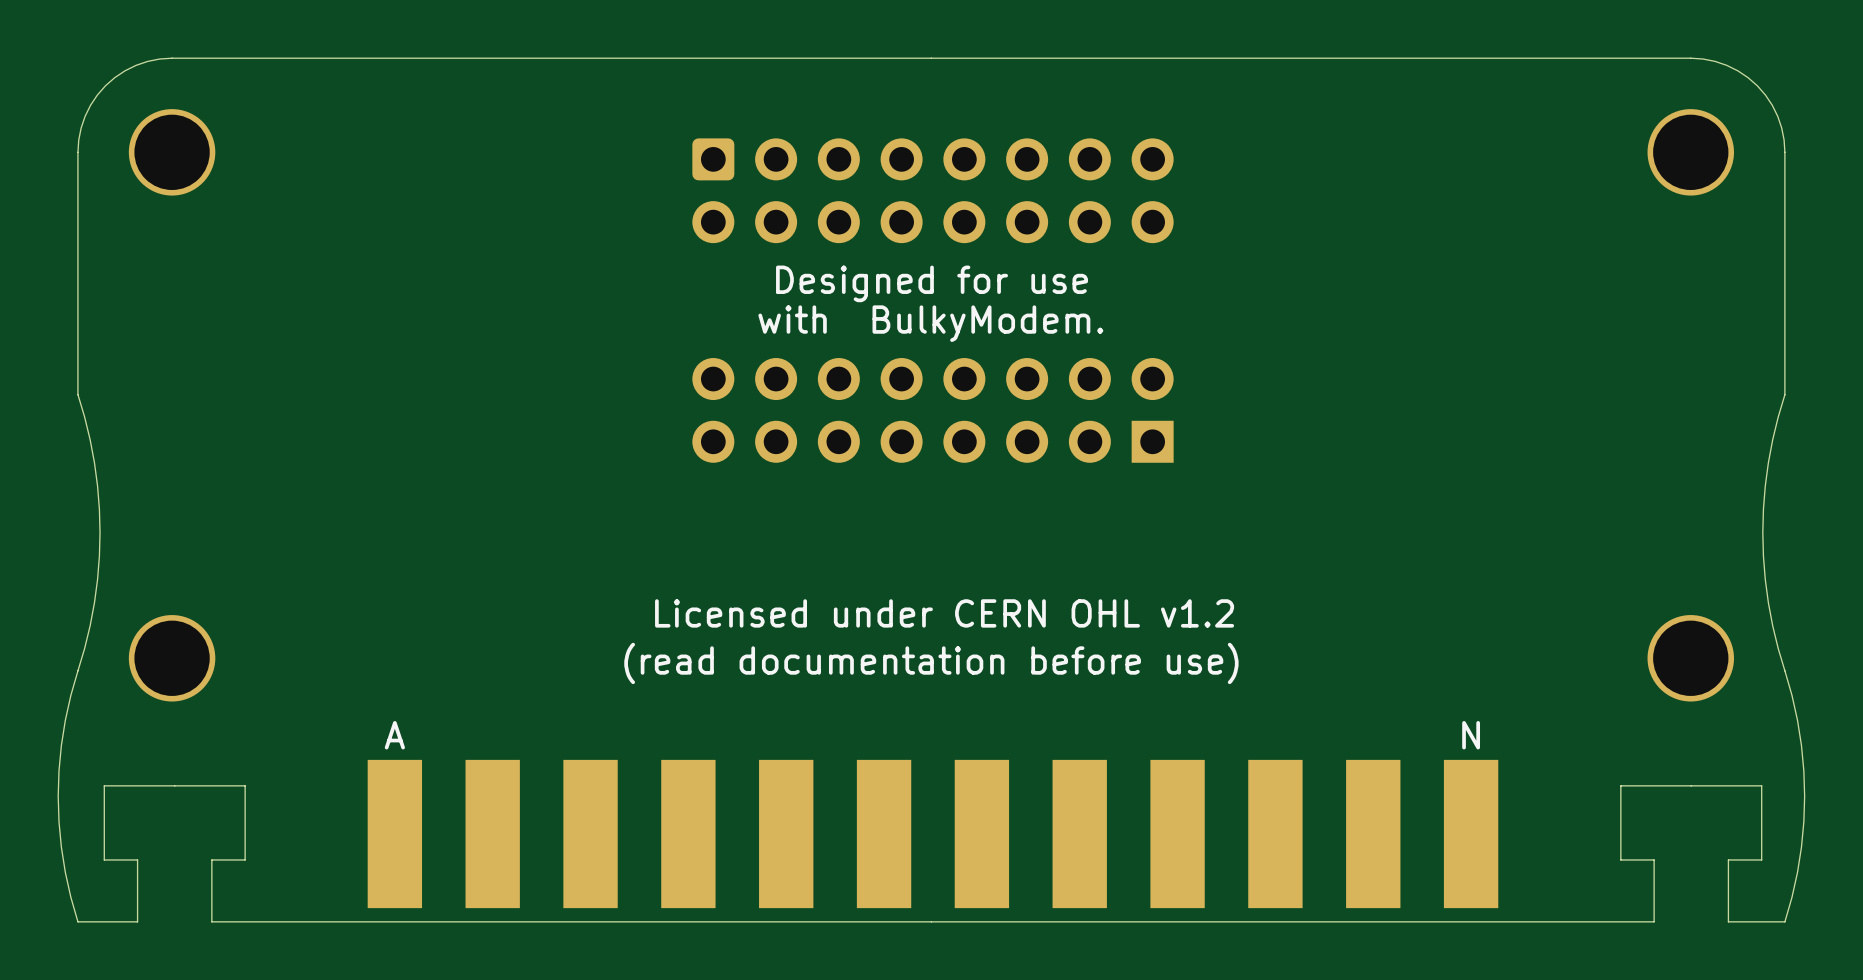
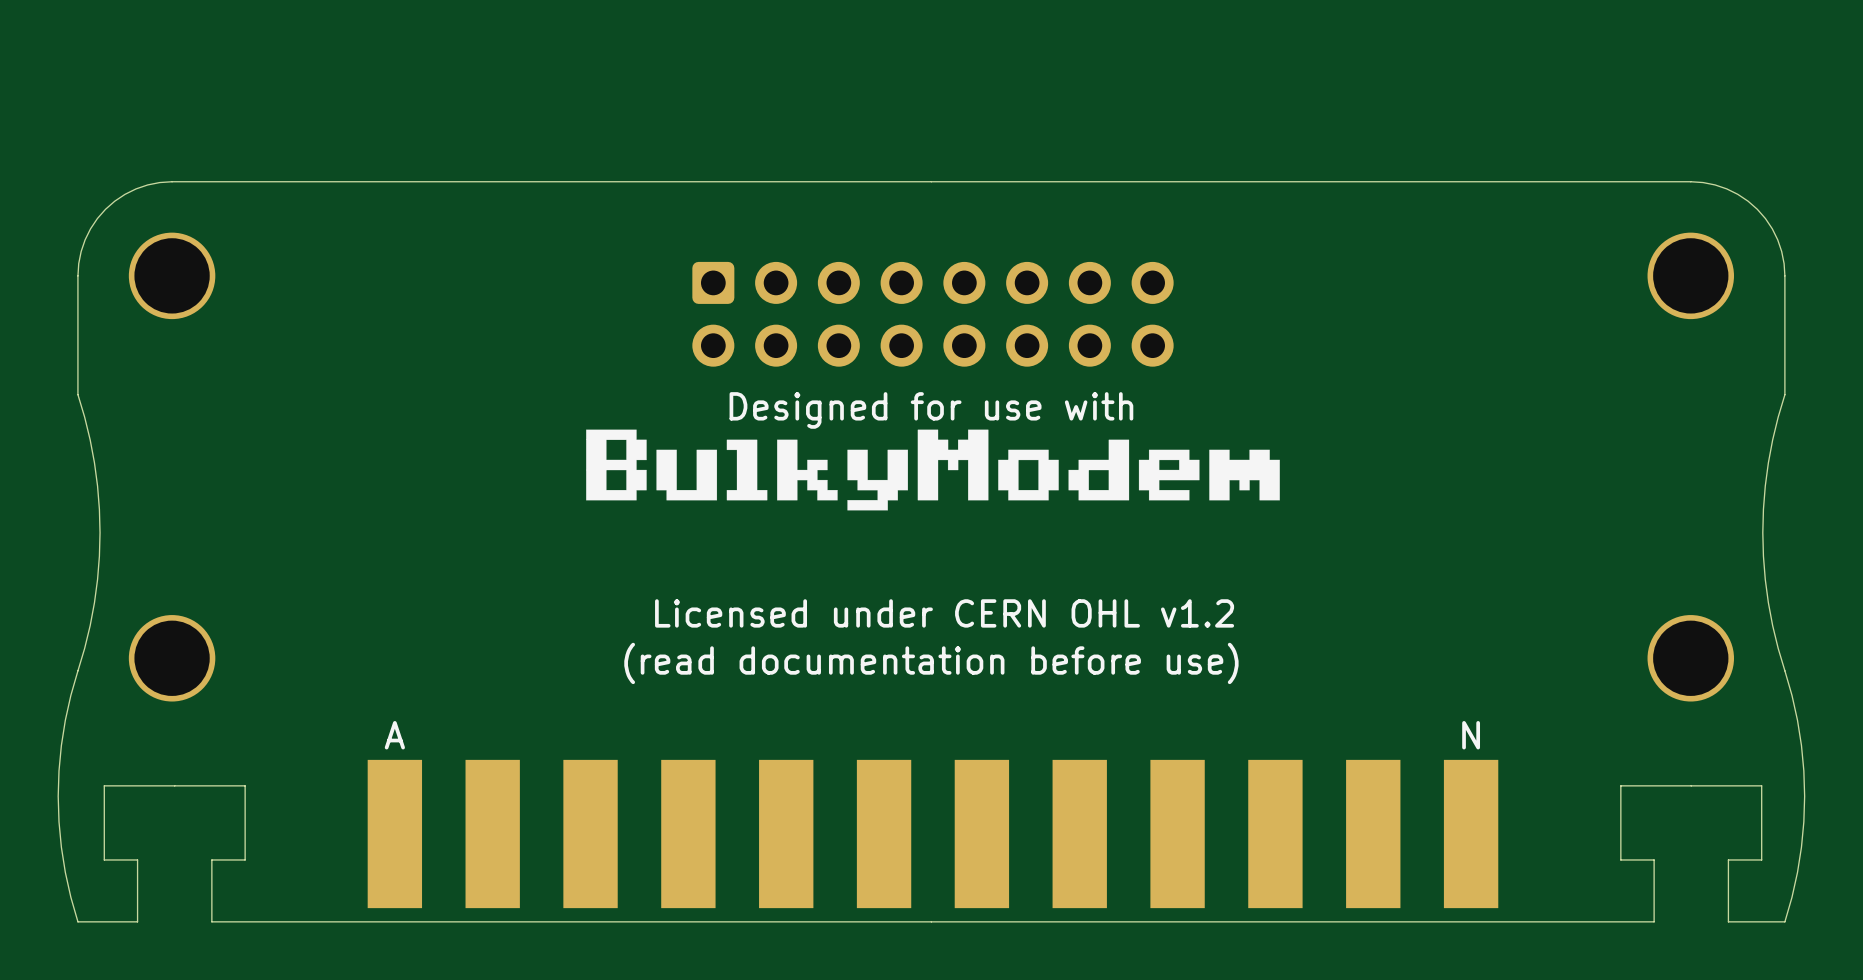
part position: (172, 152) -> (172, 275)
part position: (1690, 152) -> (1690, 275)
part position: (932, 190) -> (932, 314)
board edge: (1784, 275) (1784, 152) (1781, 127) (1777, 116) (1765, 95) (1748, 77) (1726, 65) (1703, 59) (1690, 58) (159, 59) (136, 65) (114, 77) (97, 95) (85, 116) (78, 140) (77, 152) (77, 275) -> (1784, 275) (1784, 263) (1777, 239) (1765, 218) (1757, 209) (1748, 201) (1726, 188) (1703, 182) (1690, 181) (172, 181) (147, 184) (136, 188) (125, 194) (105, 209) (90, 228) (85, 239) (78, 263) (77, 275)
text: Designed for use (932, 283) -> none
text: with BulkyModem. (930, 323) -> none
text: none -> Designed for use with (931, 410)
part: (932, 410) -> none
drawing: none -> [586, 429, 1280, 511]

